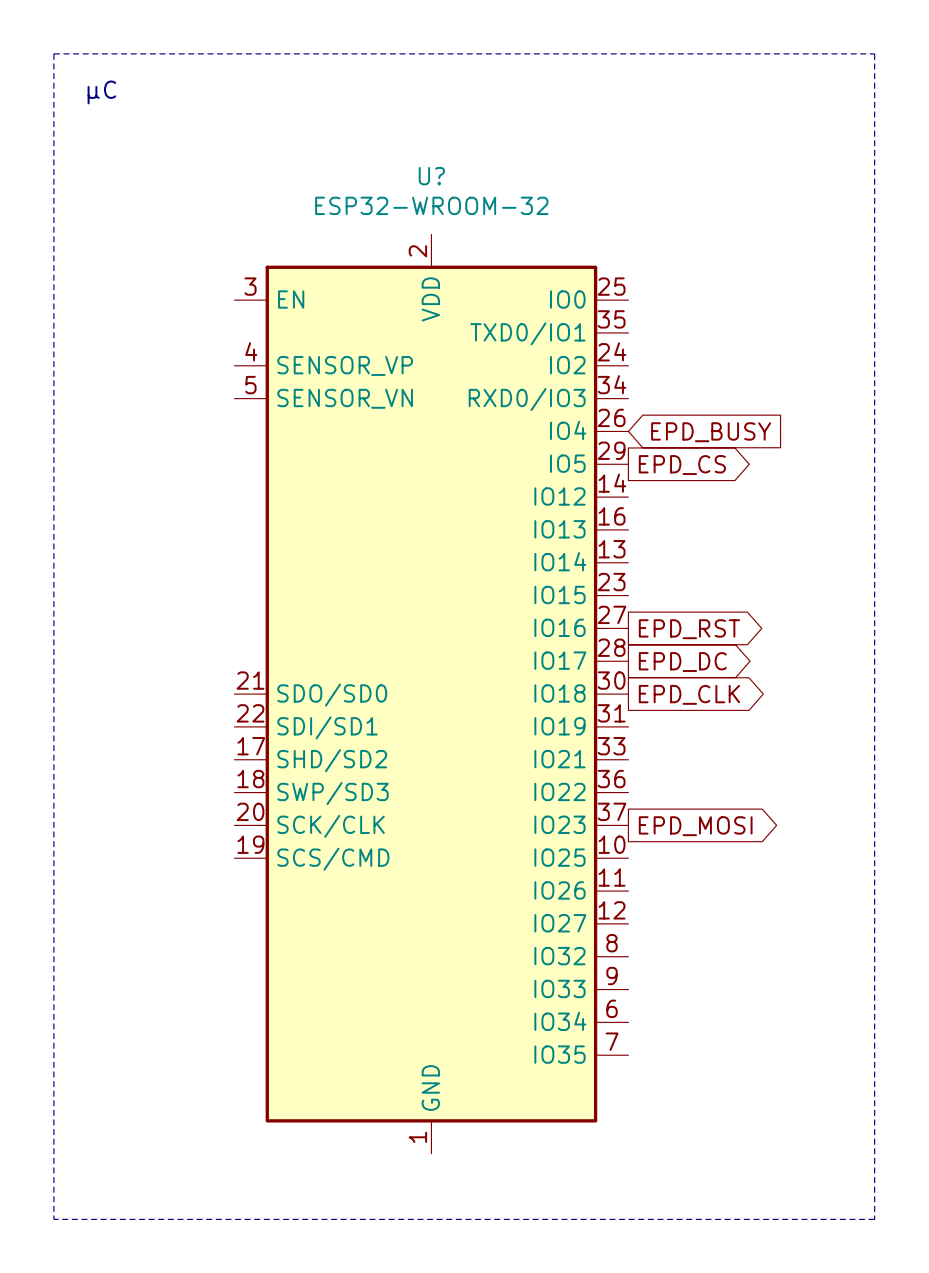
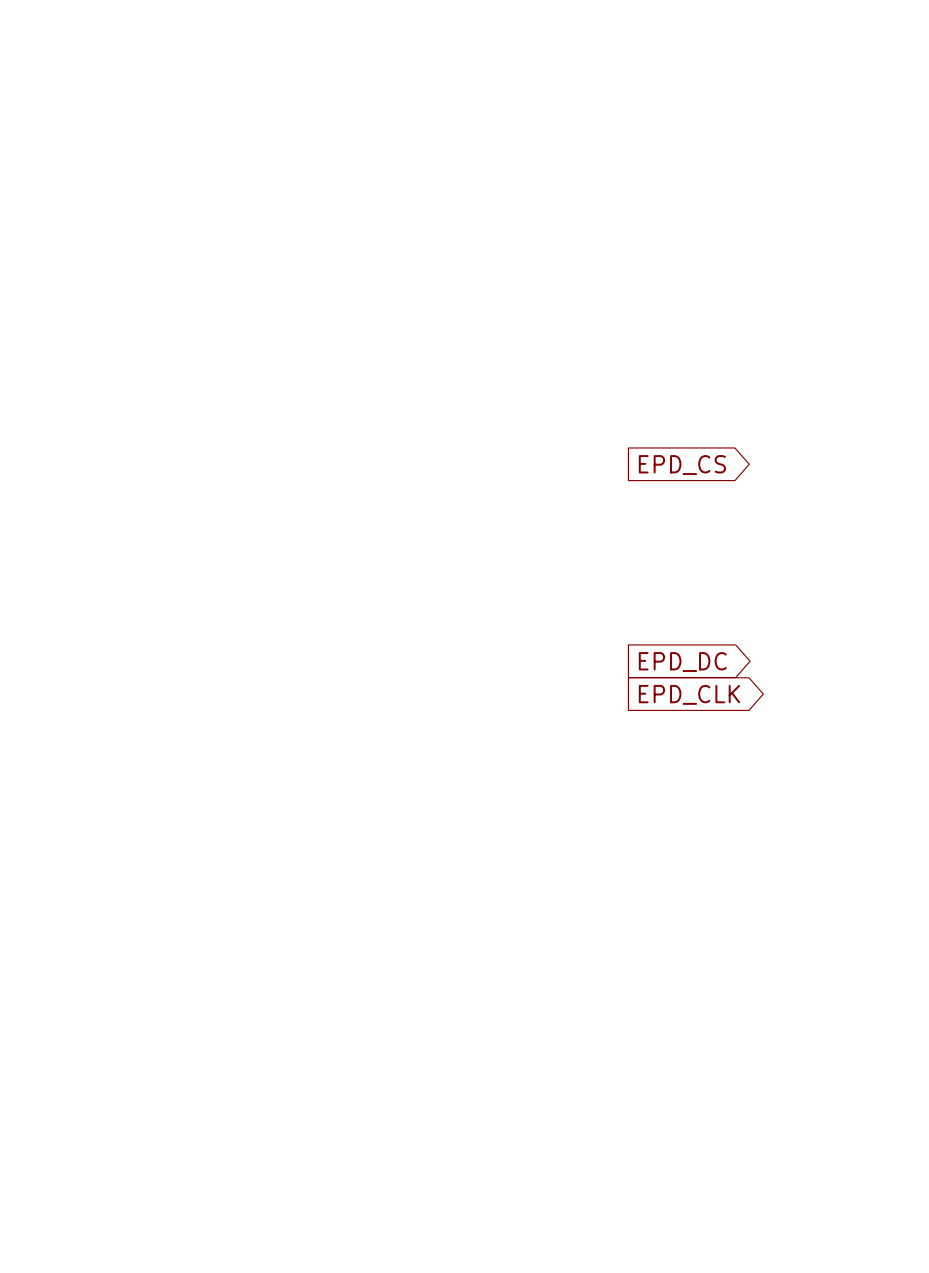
line: (53, 53) (53, 1219) (874, 1219) (874, 53) (53, 53) -> none
text: µC (101, 92) -> none
global label: EPD_BUSY (711, 432) -> none
global label: EPD_RST (689, 629) -> none
U?: ESP32-WROOM-32 (431, 694) -> none
global label: EPD_MOSI (695, 826) -> none

